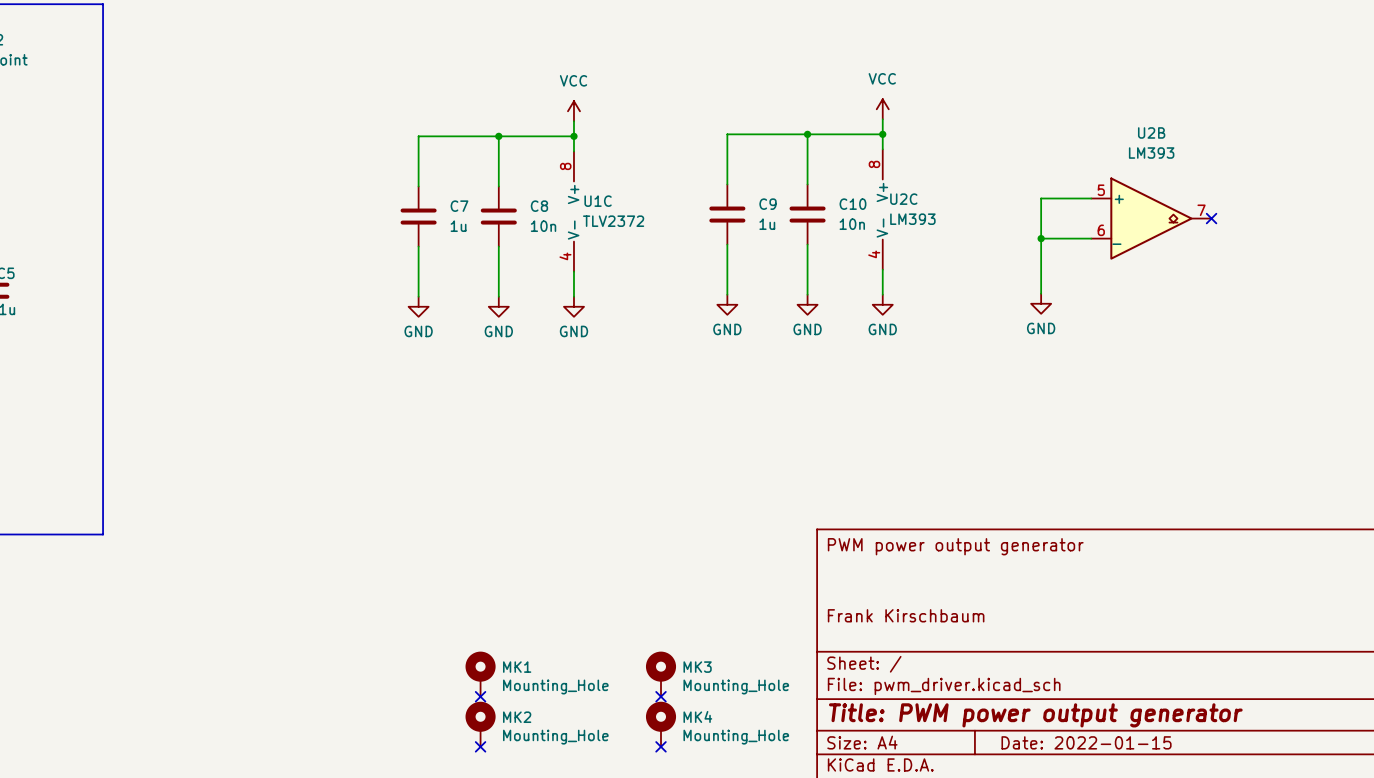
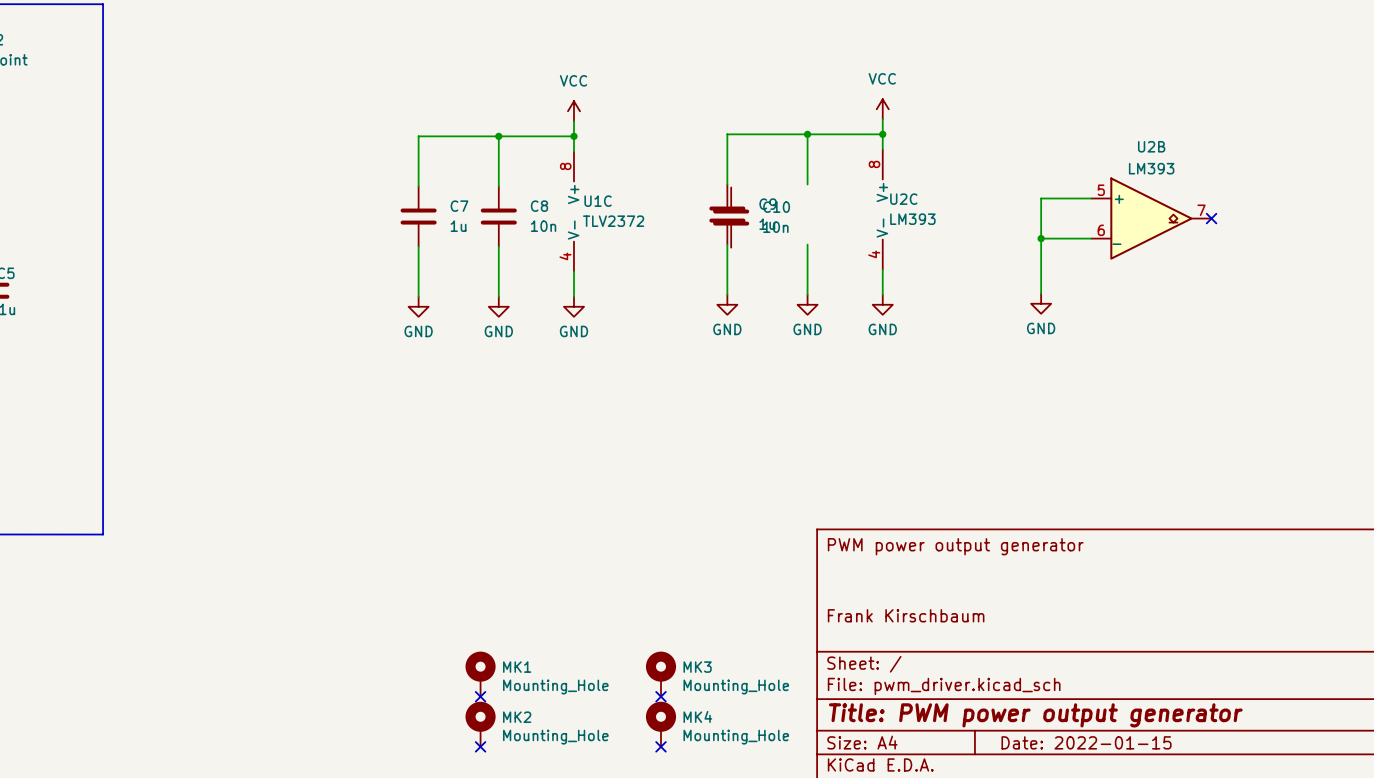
U2B name position: U2B (1151, 132) -> U2B (1151, 146)
U2B value position: LM393 (1151, 153) -> LM393 (1151, 168)
C10 position: (807, 214) -> (731, 217)

